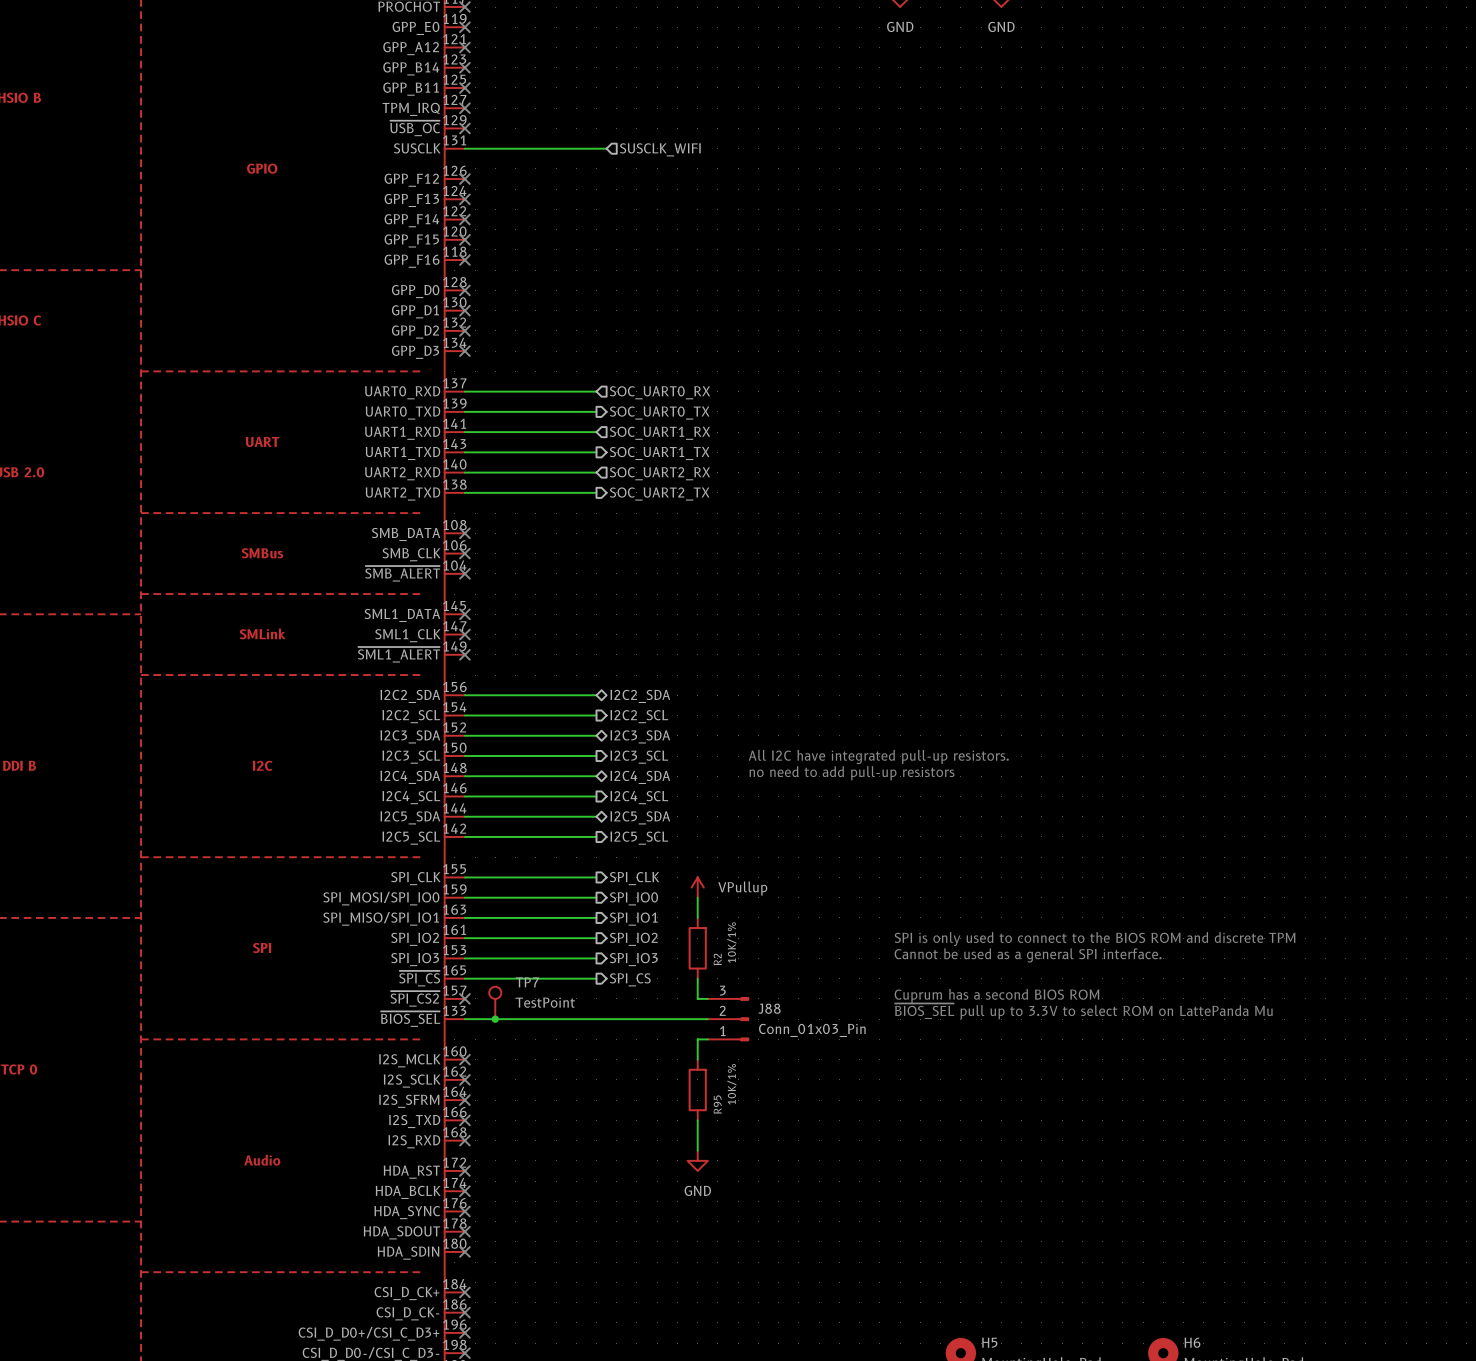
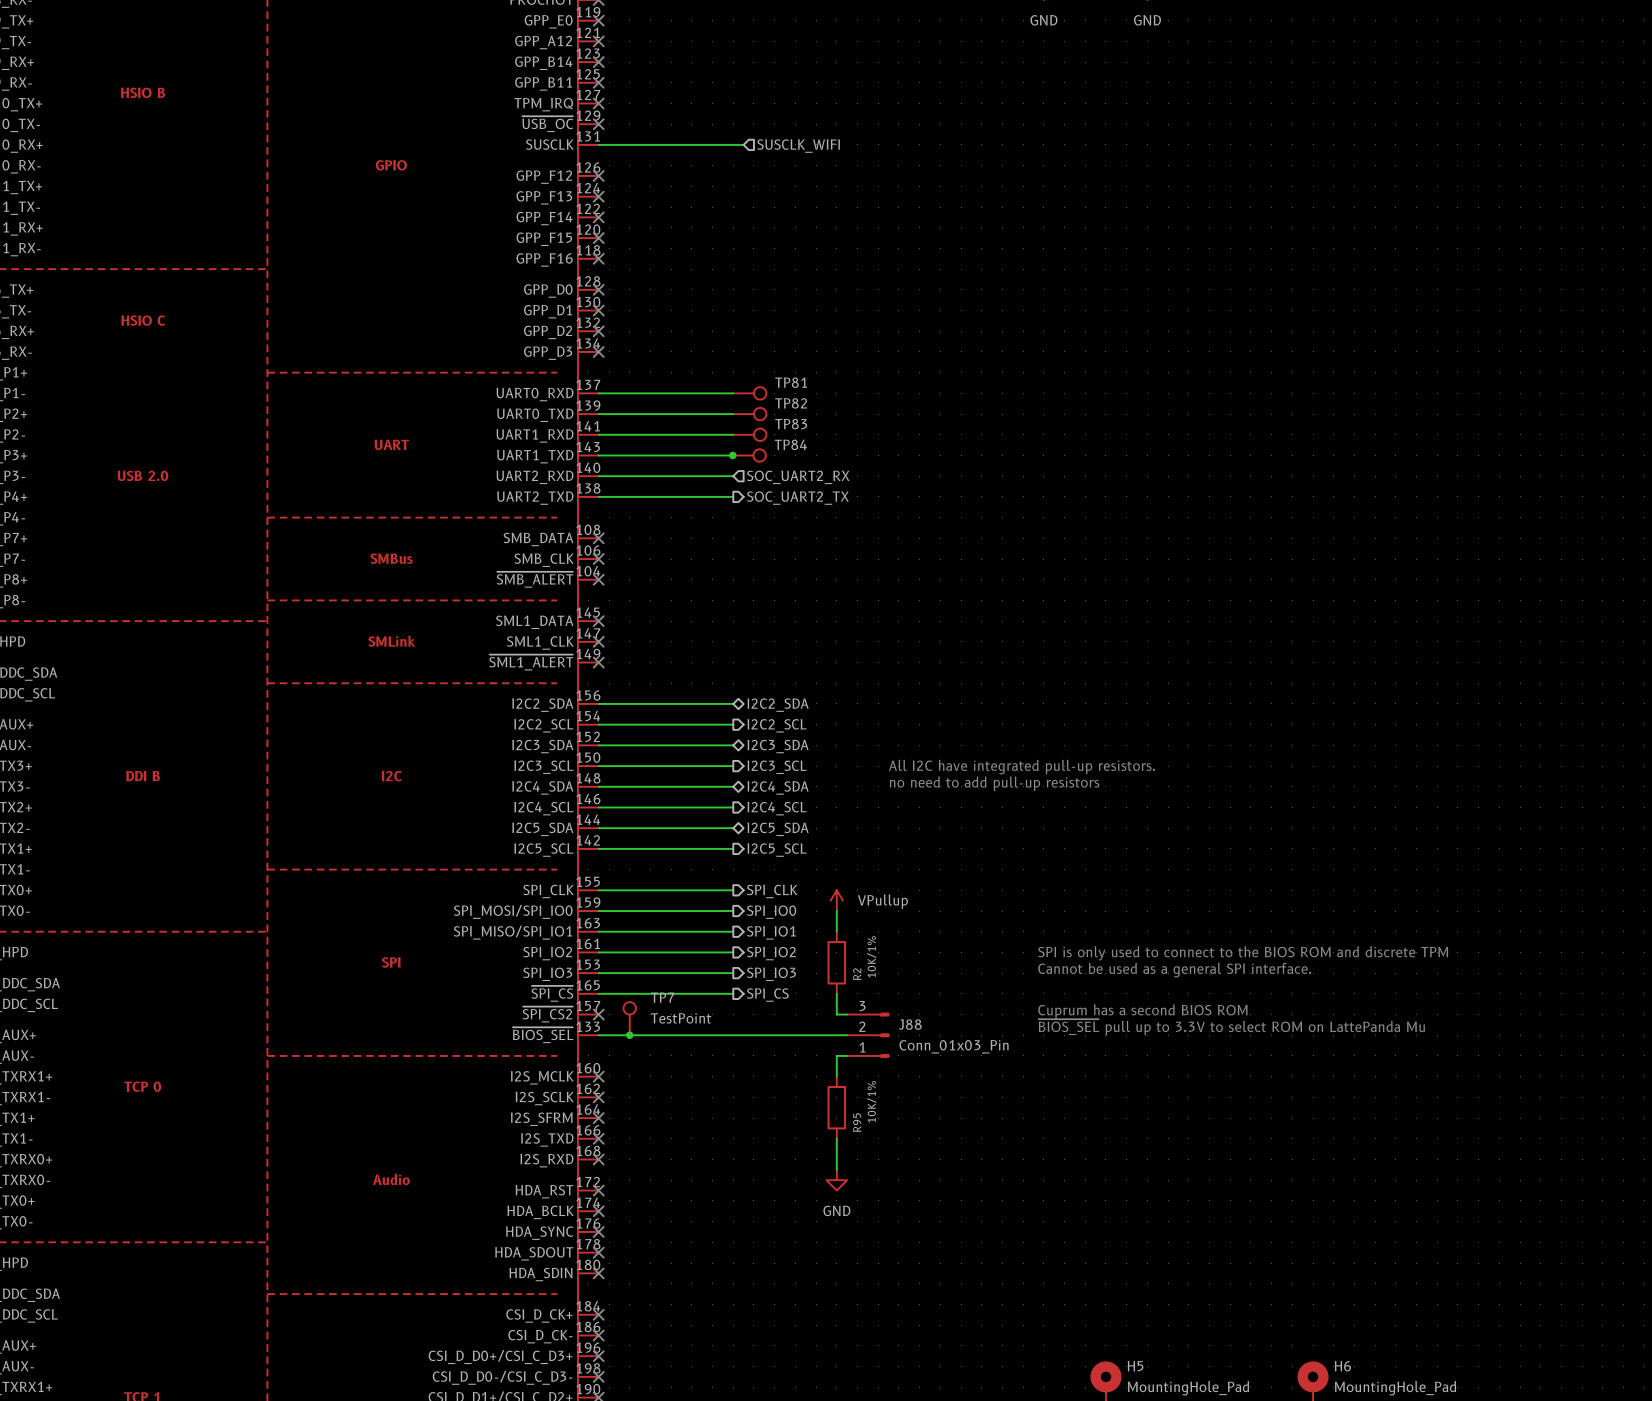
TP81: none -> (749, 393)
hierarchical label: SOC_UART0_RX (660, 392) -> none
TP82: none -> (749, 414)
hierarchical label: SOC_UART0_TX (659, 413) -> none
TP83: none -> (749, 434)
hierarchical label: SOC_UART1_RX (660, 433) -> none
junction: none -> (732, 455)
TP84: none -> (749, 455)
hierarchical label: SOC_UART1_TX (659, 453) -> none

